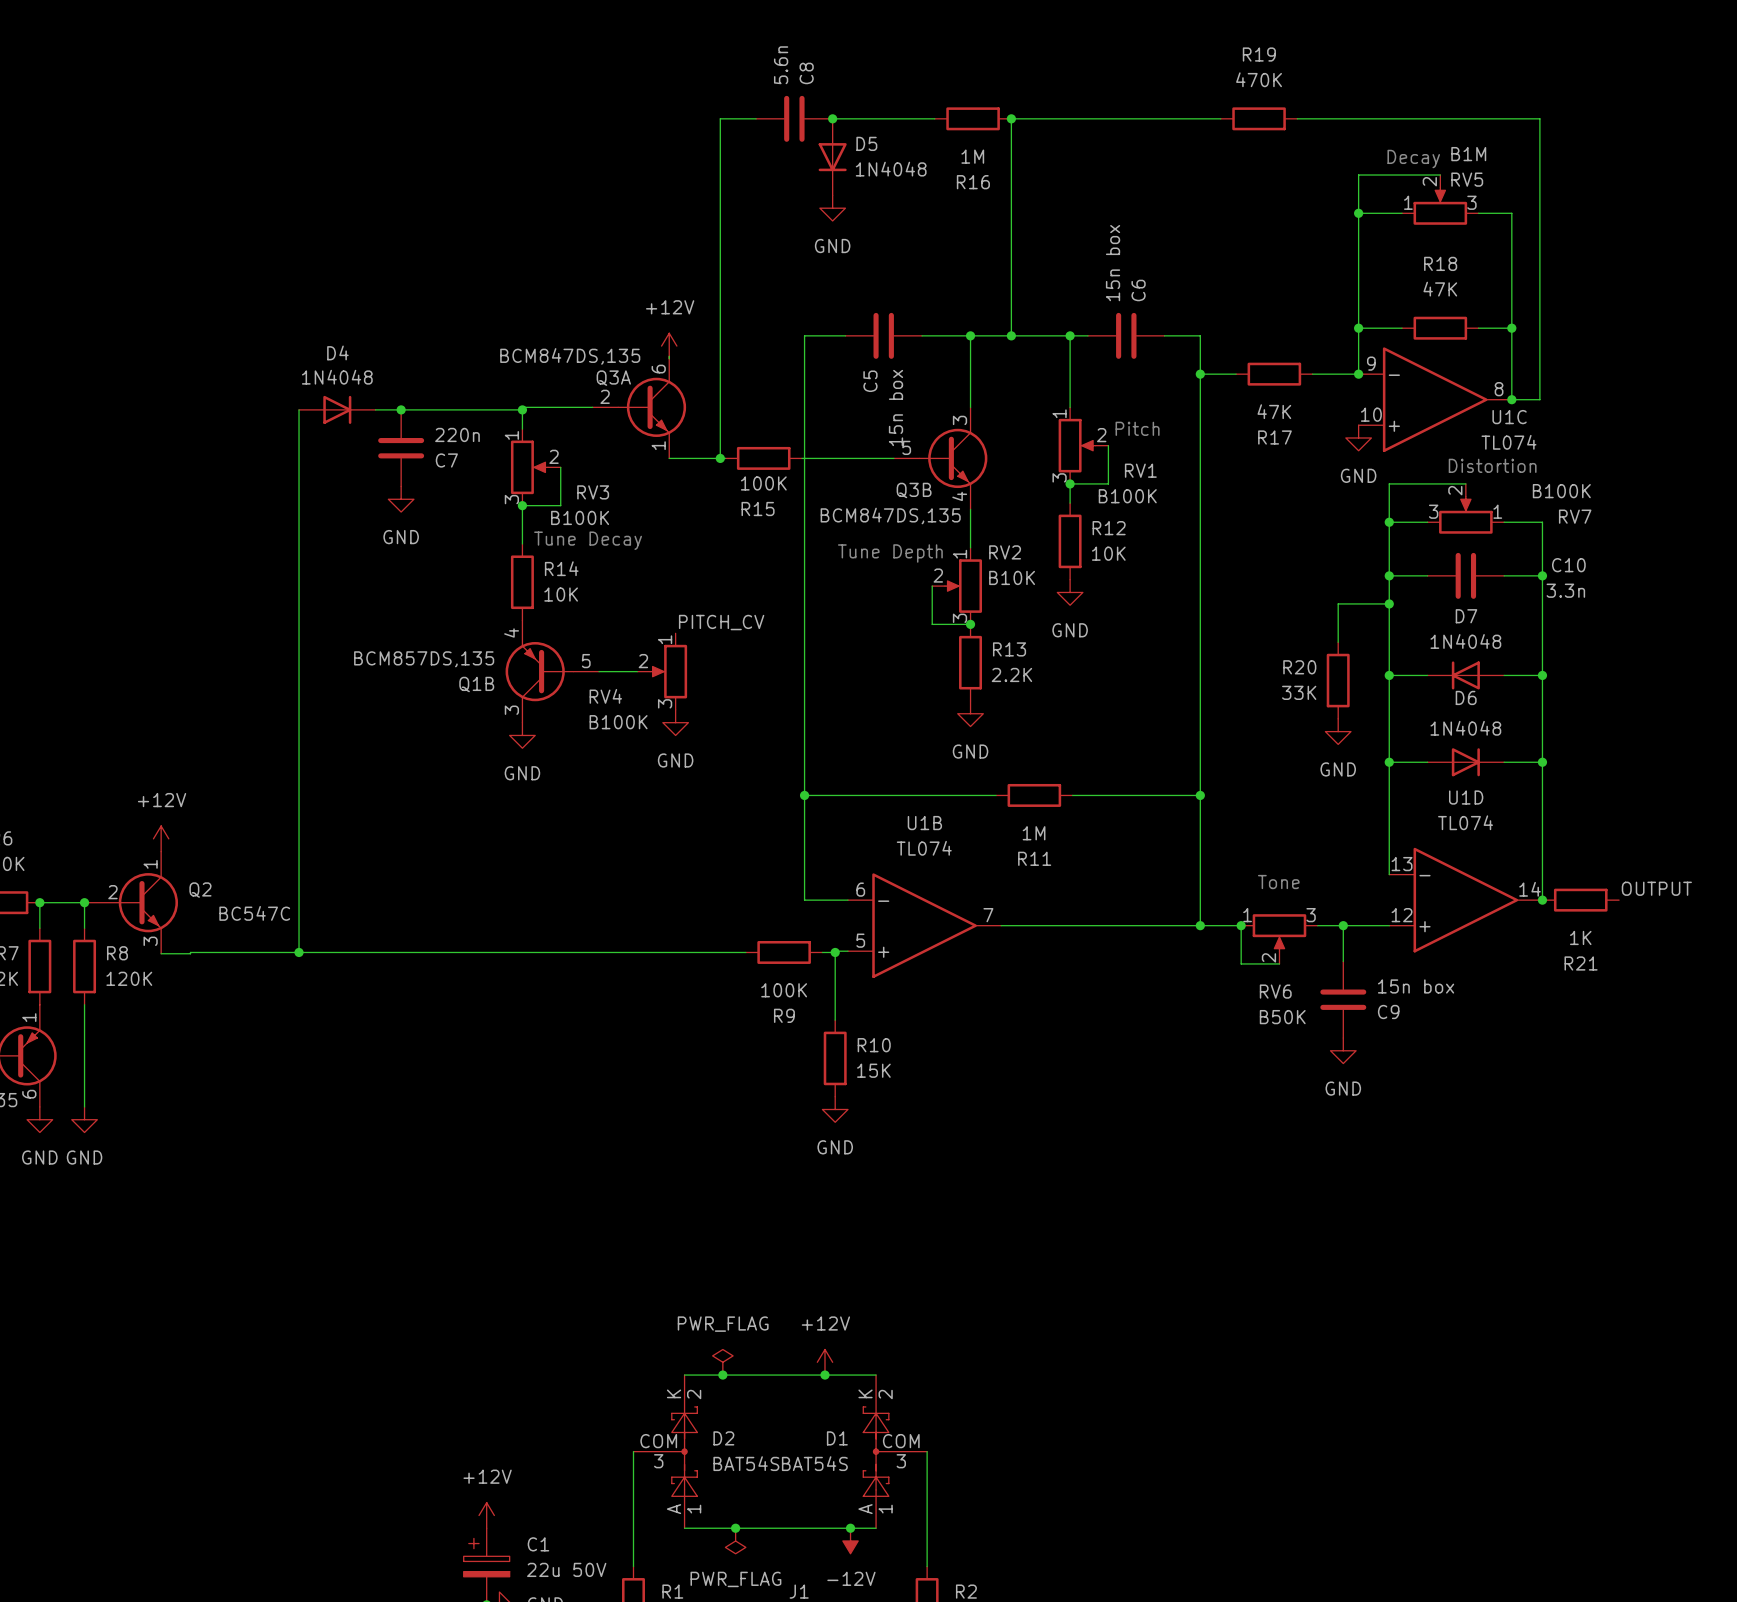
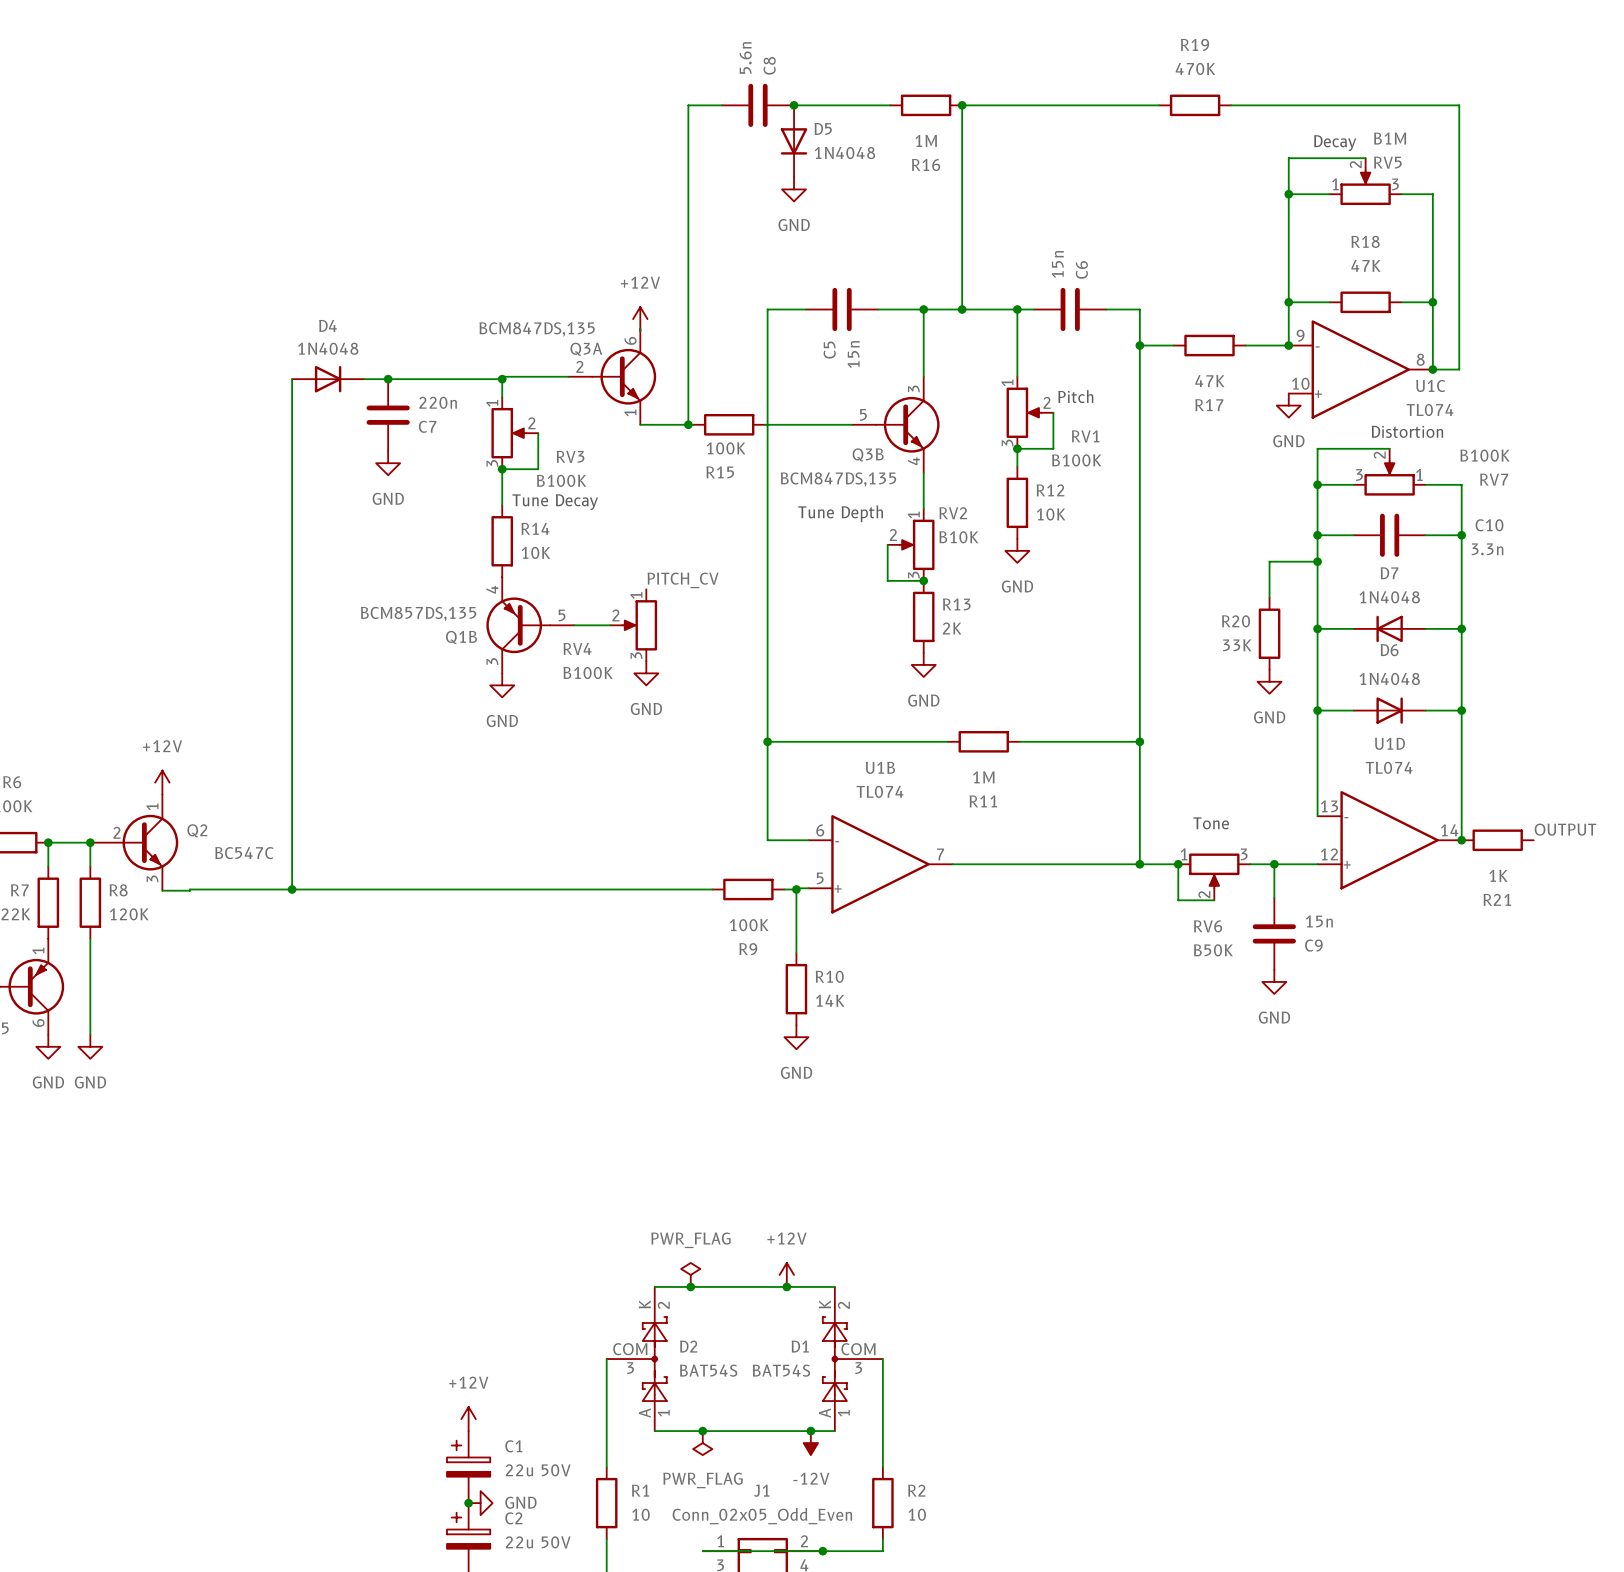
C6 value: 15n box (1113, 263) -> 15n (1057, 264)
C5 value: 15n box (896, 407) -> 15n (853, 354)
R13 value: 2.2K (1011, 674) -> 2K (952, 628)
C9 value: 15n box (1416, 986) -> 15n (1319, 921)
R10 value: 15K (873, 1070) -> 14K (830, 1000)

